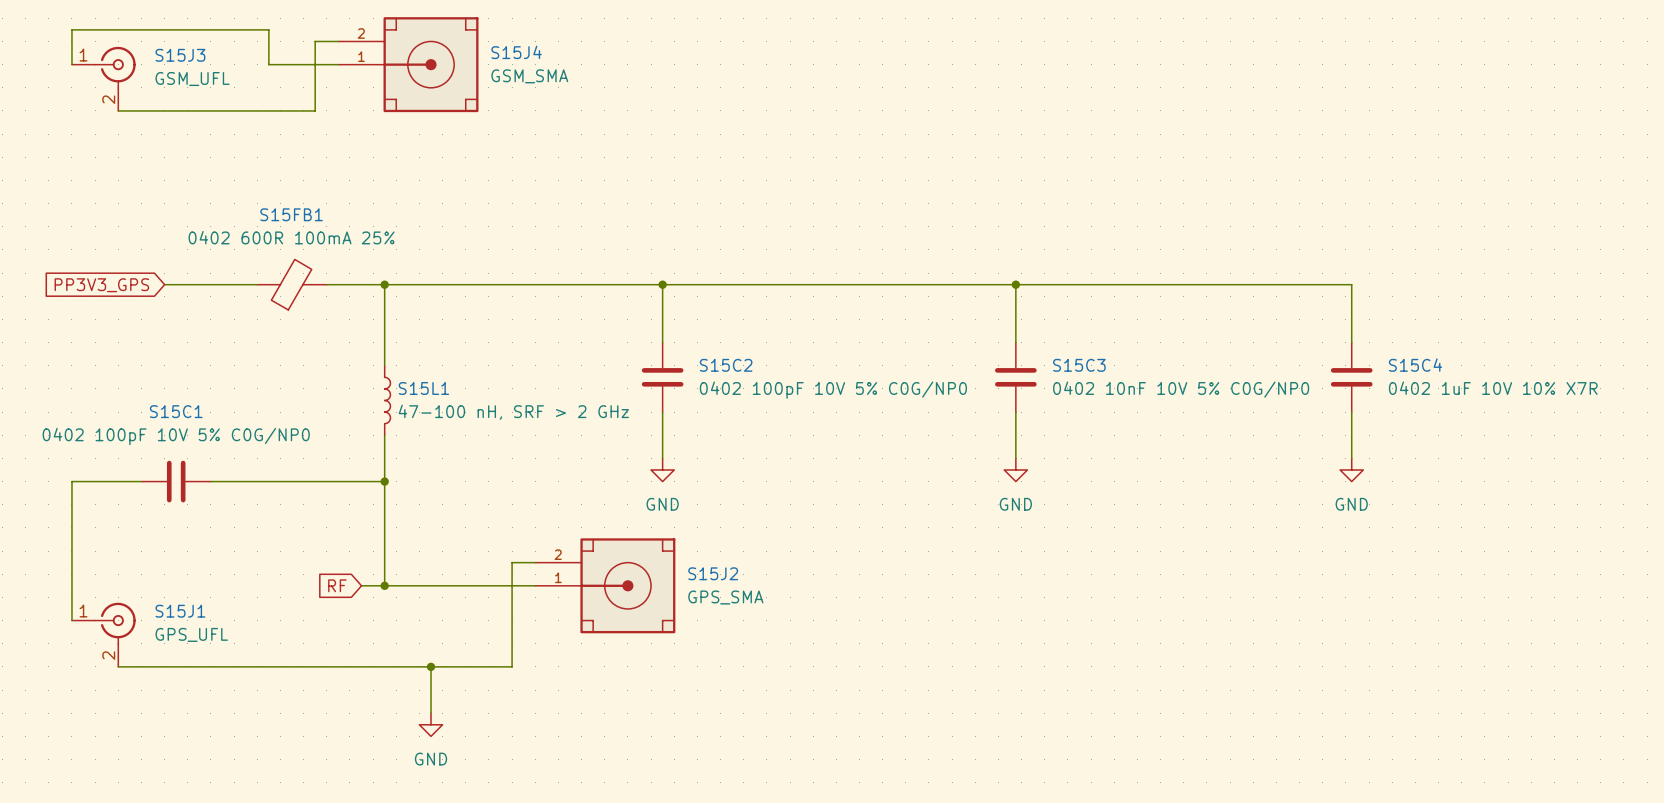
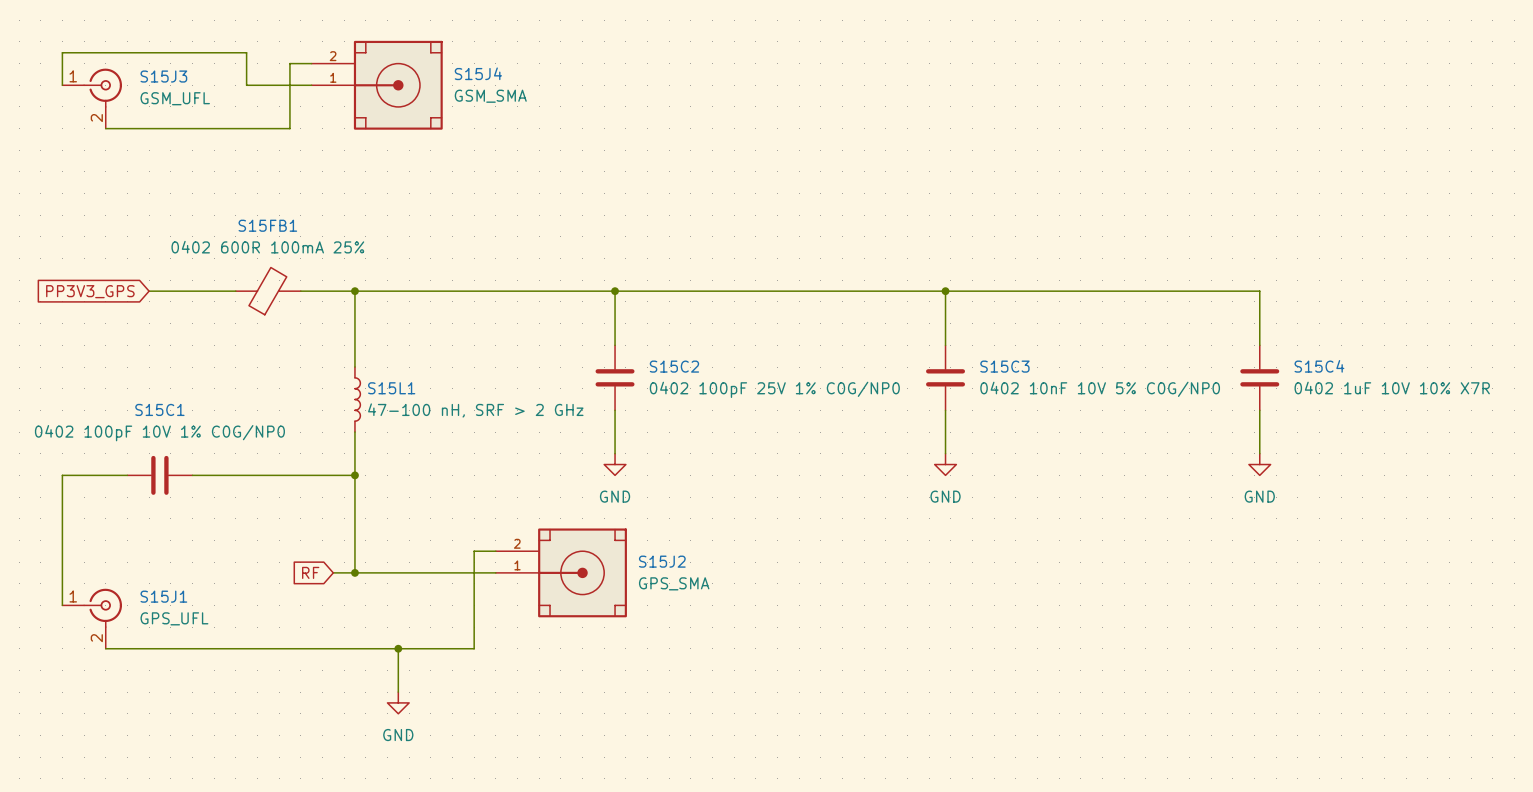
S15C2 value: 0402 100pF 10V 5% C0G/NP0 (833, 390) -> 0402 100pF 25V 1% C0G/NP0 (774, 389)
S15C1 value: 0402 100pF 10V 5% C0G/NP0 (176, 436) -> 0402 100pF 10V 1% C0G/NP0 (159, 433)

